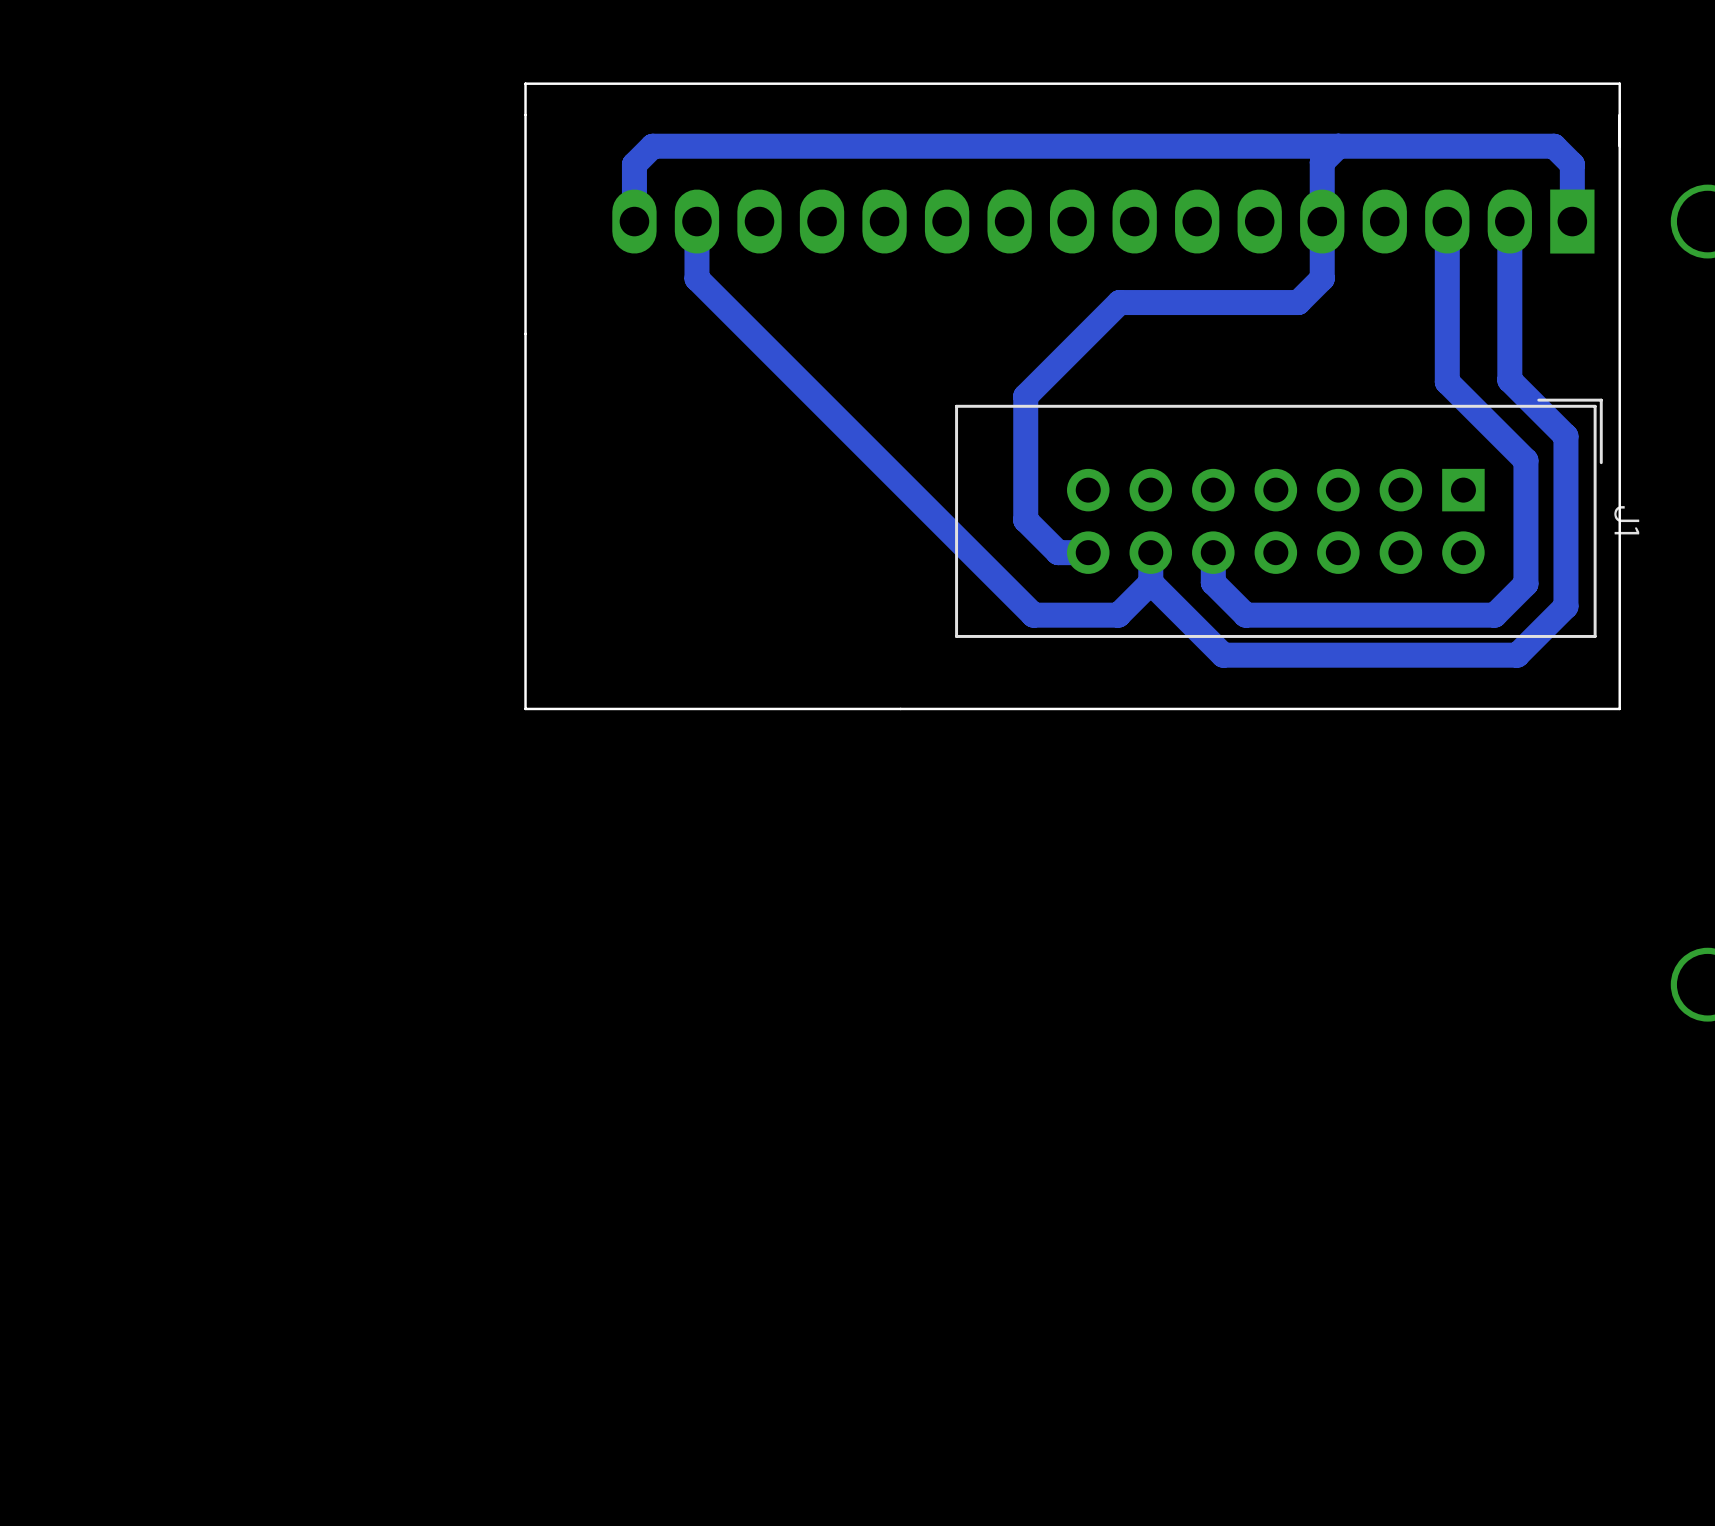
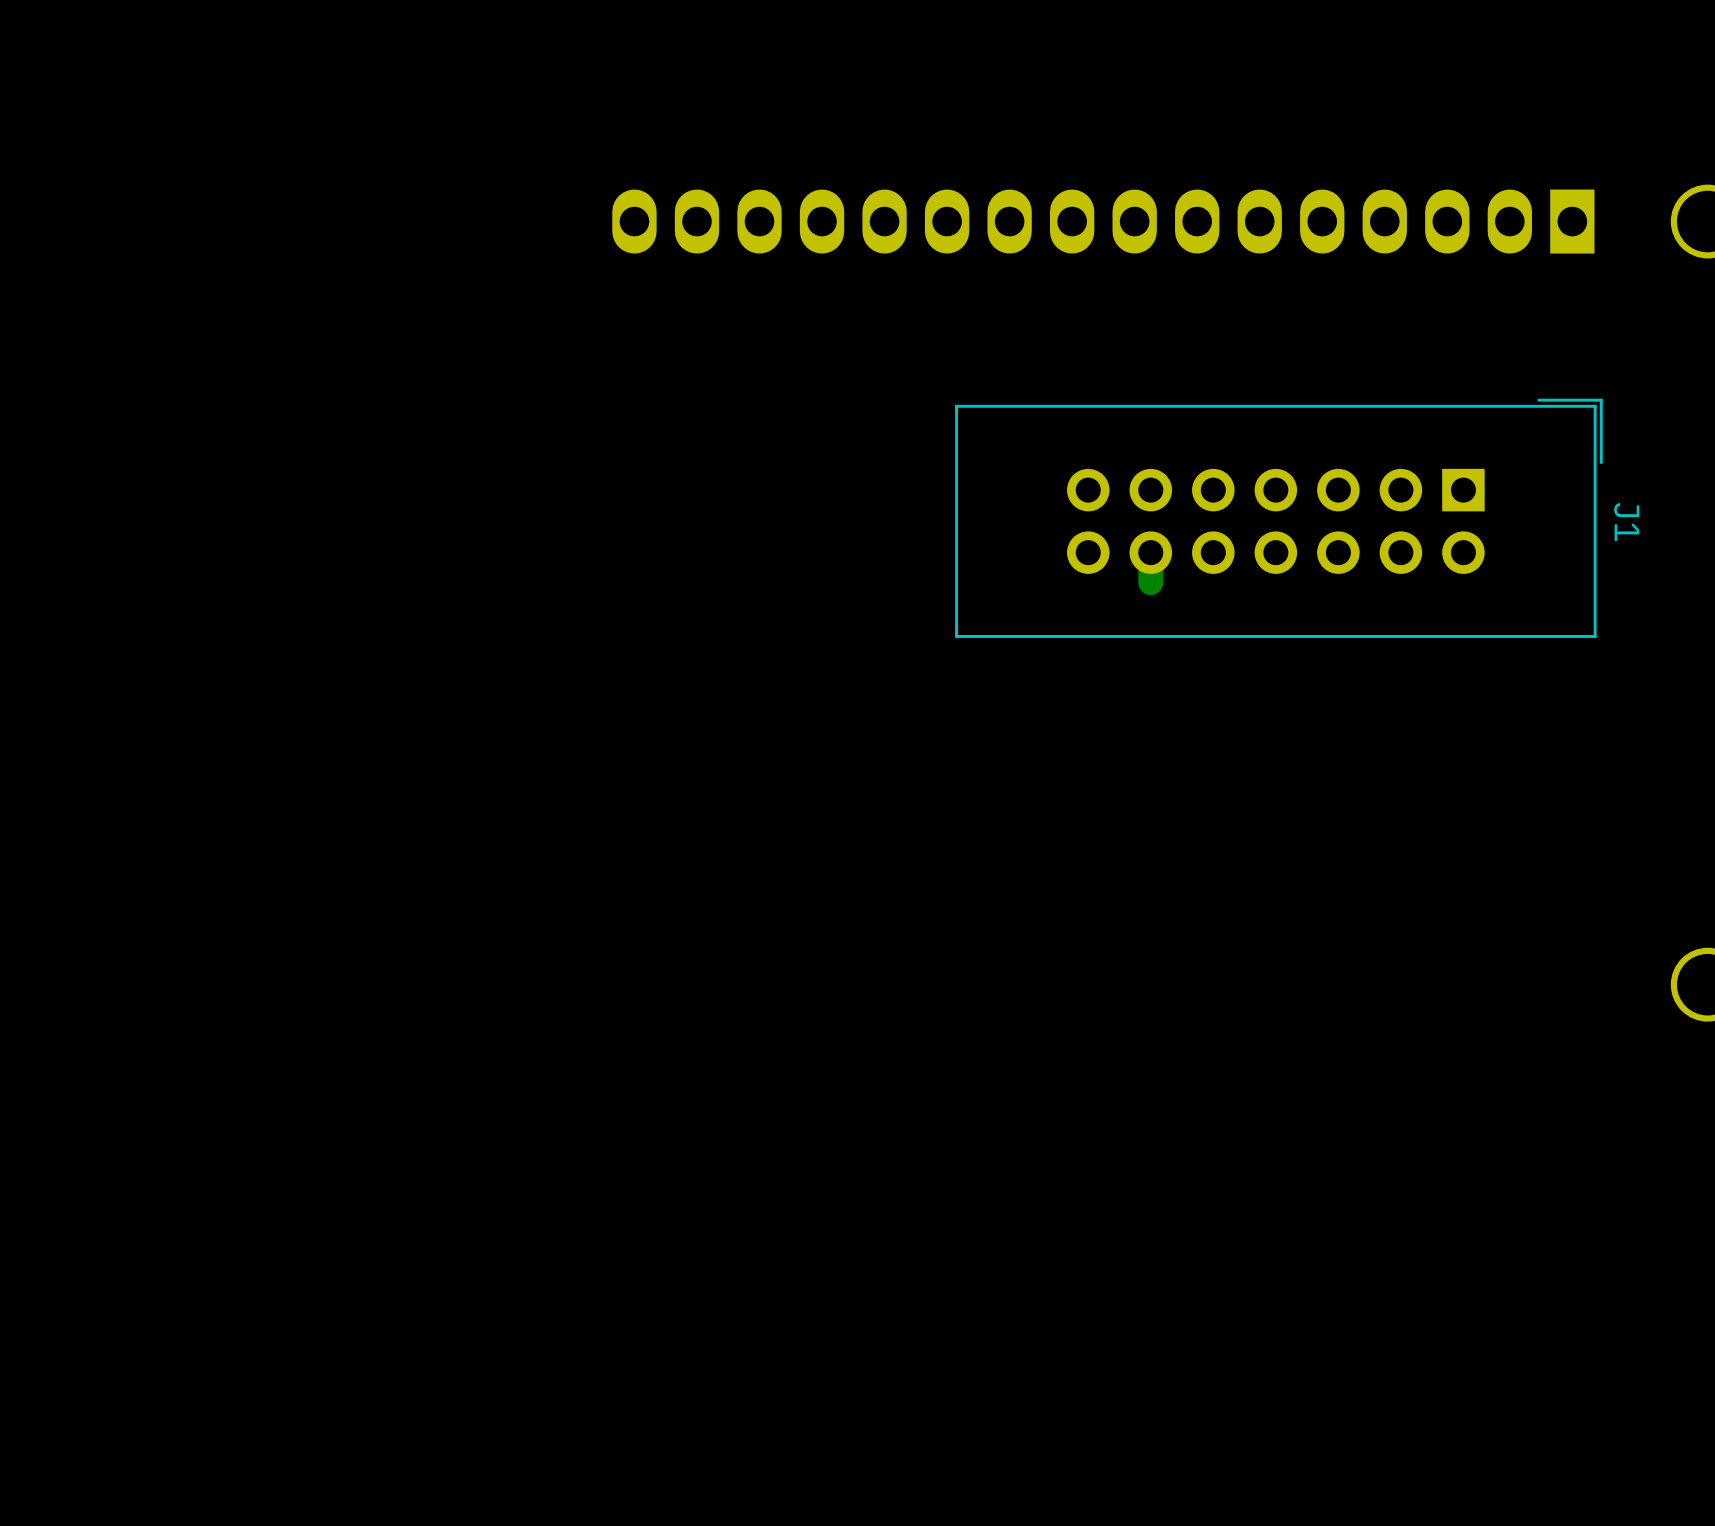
board edge: (1619, 83) (1619, 708) (525, 708) (525, 83) (1619, 83) -> none
track: (1338, 146) (1322, 162) (1322, 278) (1298, 302) (1119, 302) (1025, 396) (1025, 520) (1058, 552) (1088, 552) -> none
track: (1447, 221) (1447, 381) (1525, 460) (1525, 583) (1494, 615) (1245, 615) (1213, 582) (1213, 552) -> none
track: (1509, 221) (1509, 380) (1565, 436) (1565, 606) (1517, 655) (1223, 655) (1150, 582) (1118, 615) (1033, 615) (696, 278) (696, 221) -> none
track: (1572, 221) (1572, 164) (1554, 146) (652, 146) (634, 164) (634, 221) -> none

